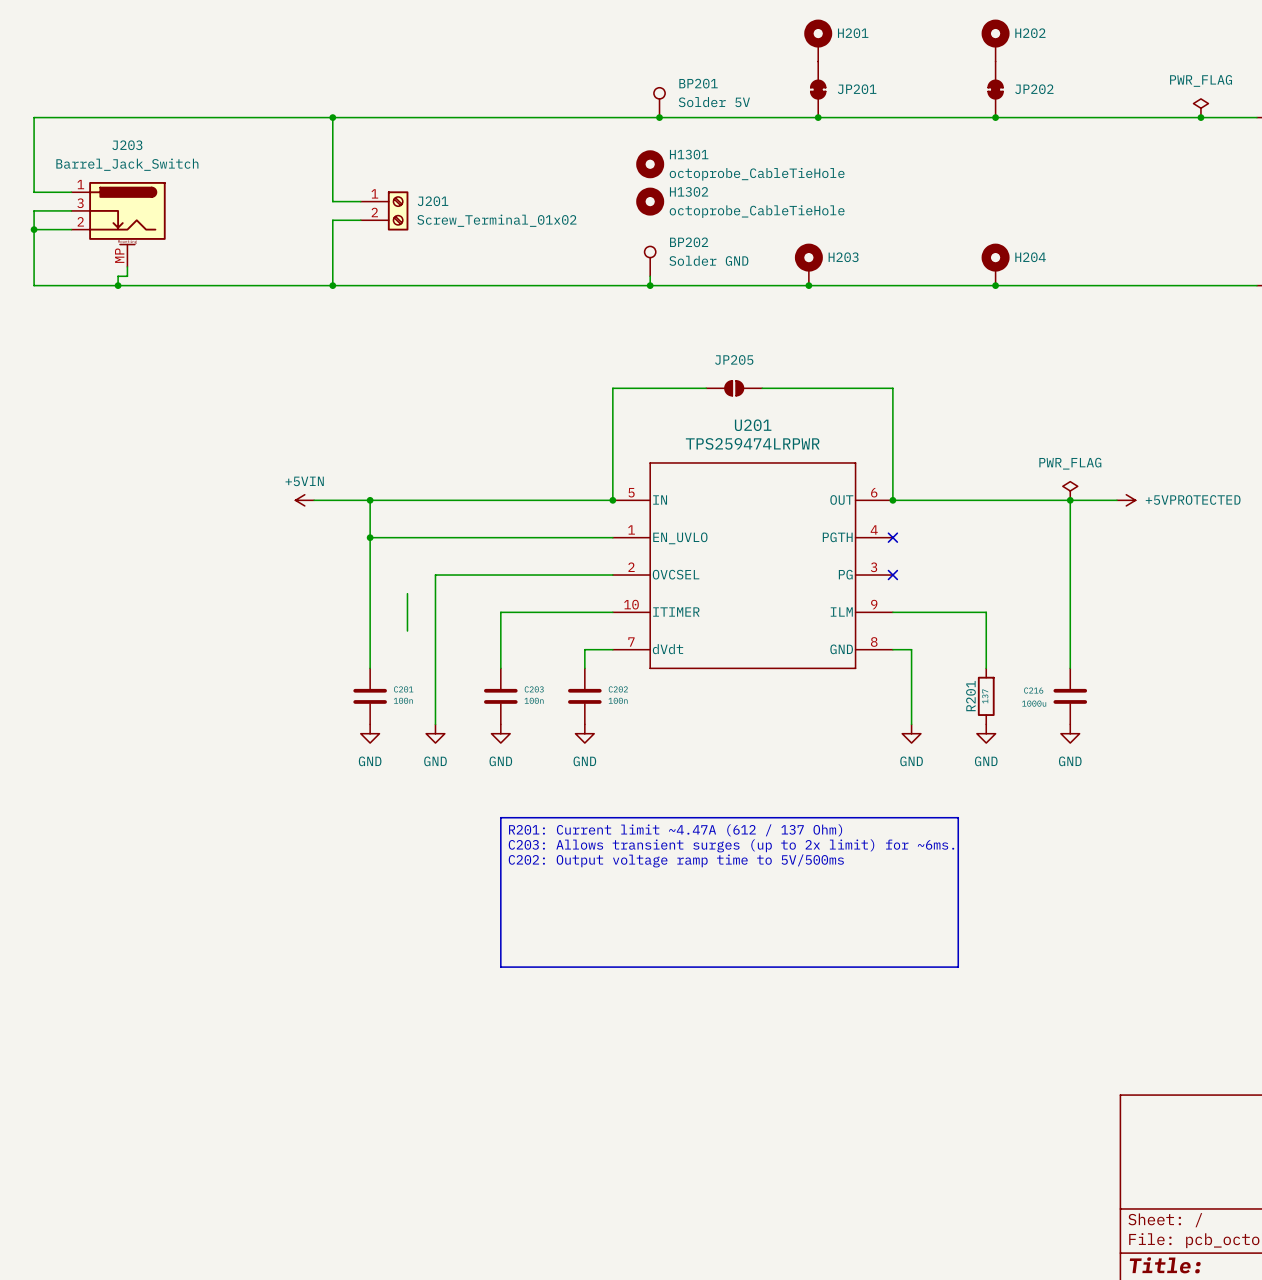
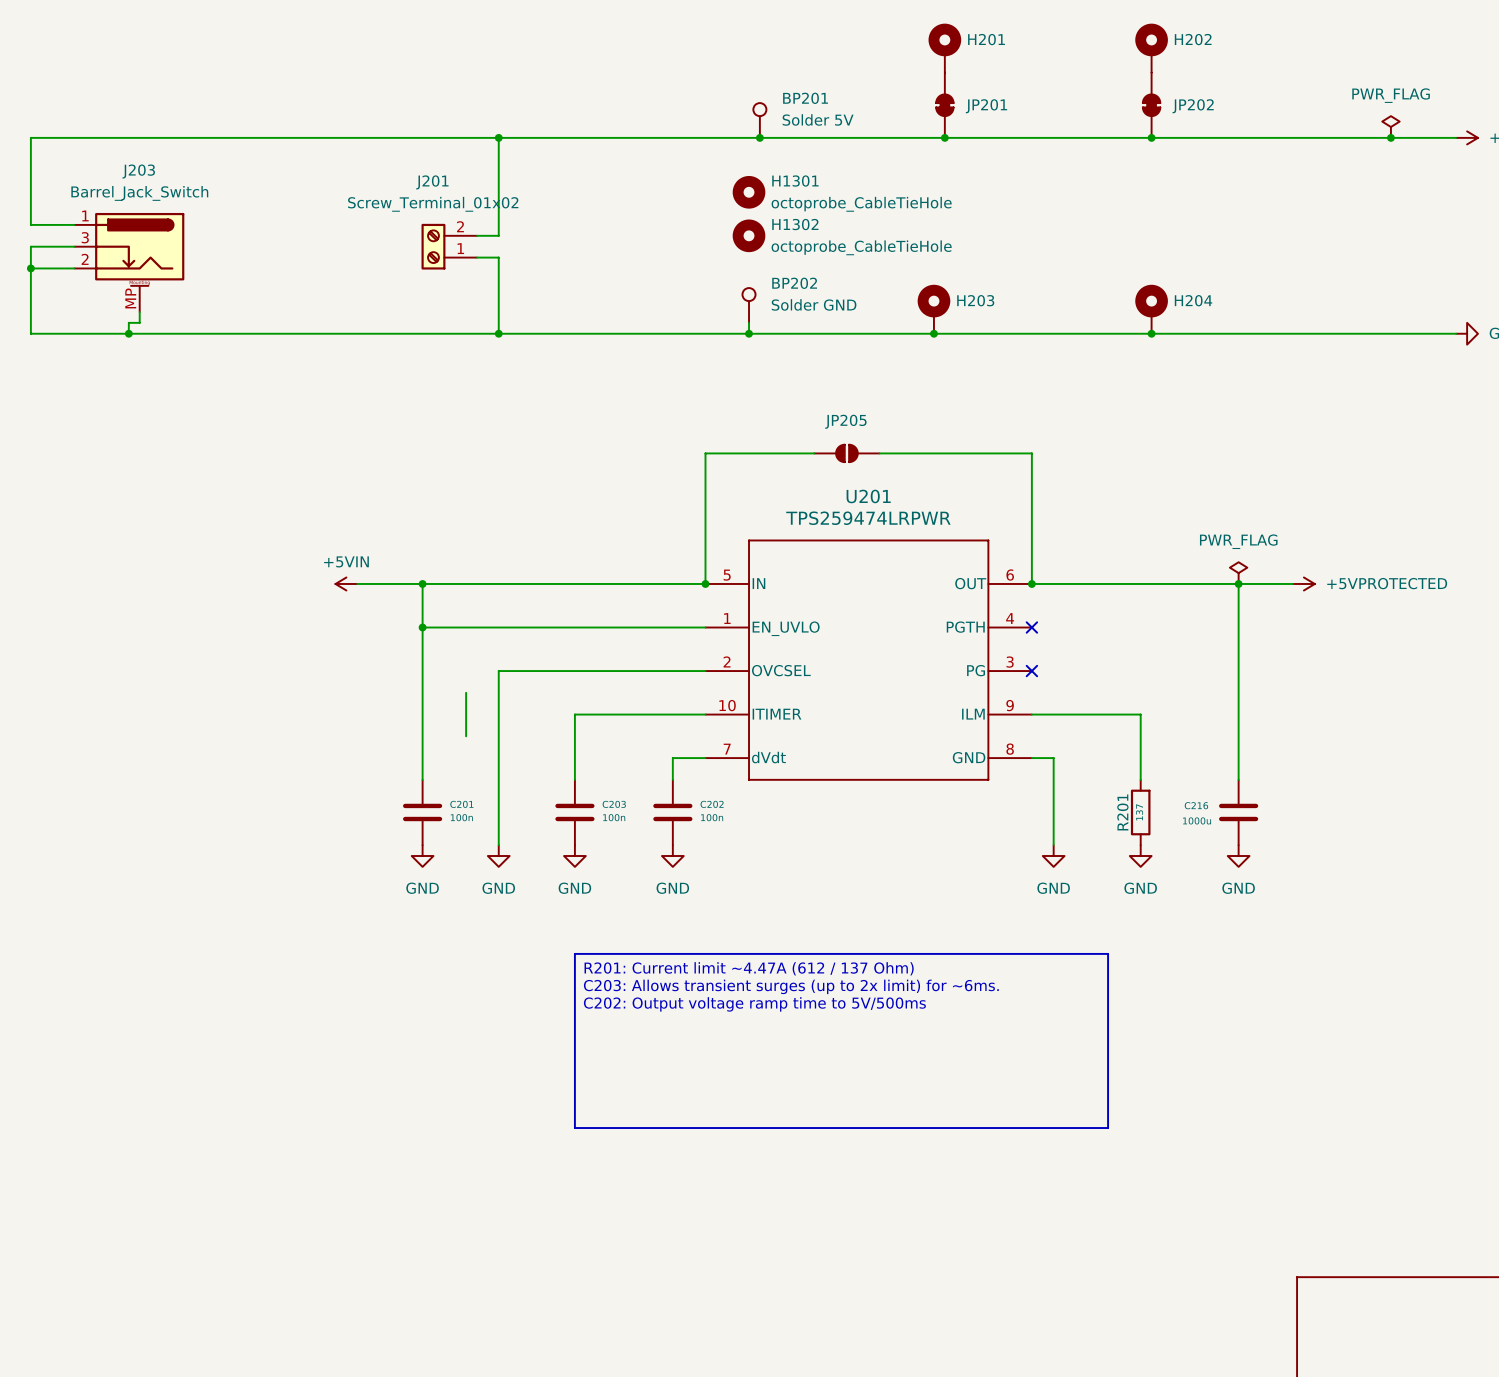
wire: (332, 117) (332, 201) (360, 201) -> none
junction: (332, 117) -> none
wire: none -> (498, 137) (498, 235) (477, 235)
junction: none -> (498, 137)
J201 name position: J201 (433, 201) -> J201 (432, 182)
J201 rotation: 0° (398, 210) -> 180° (433, 246)
wire: (360, 220) (332, 220) (332, 285) -> none
wire: none -> (477, 257) (498, 257) (498, 333)
J201 value position: Screw_Terminal_01x02 (496, 220) -> Screw_Terminal_01x02 (433, 204)
junction: (332, 285) -> none
junction: none -> (498, 333)

